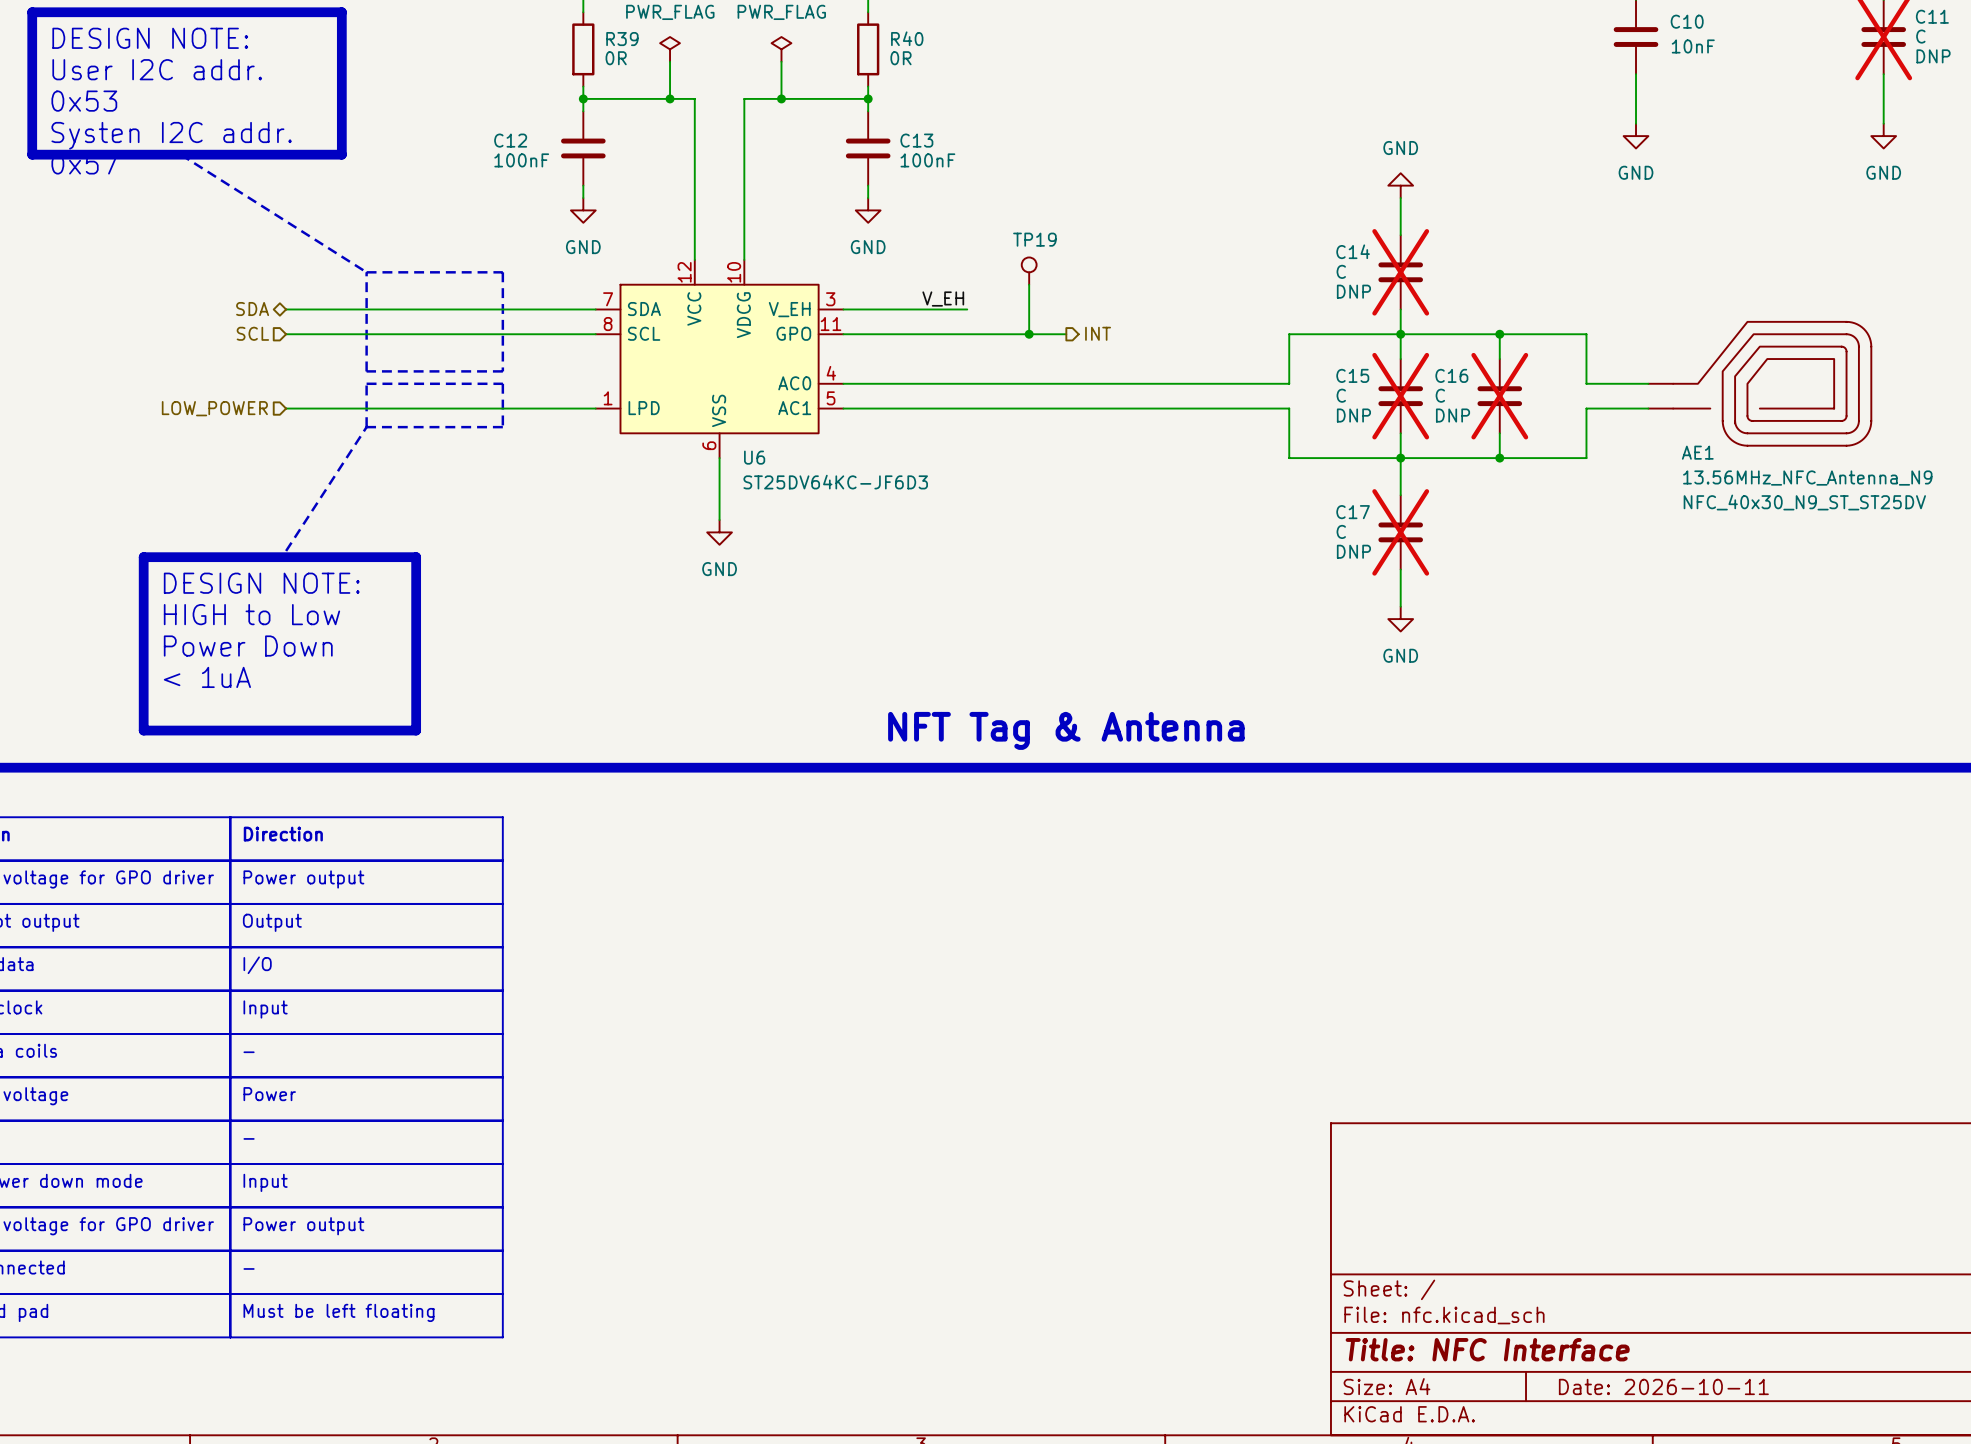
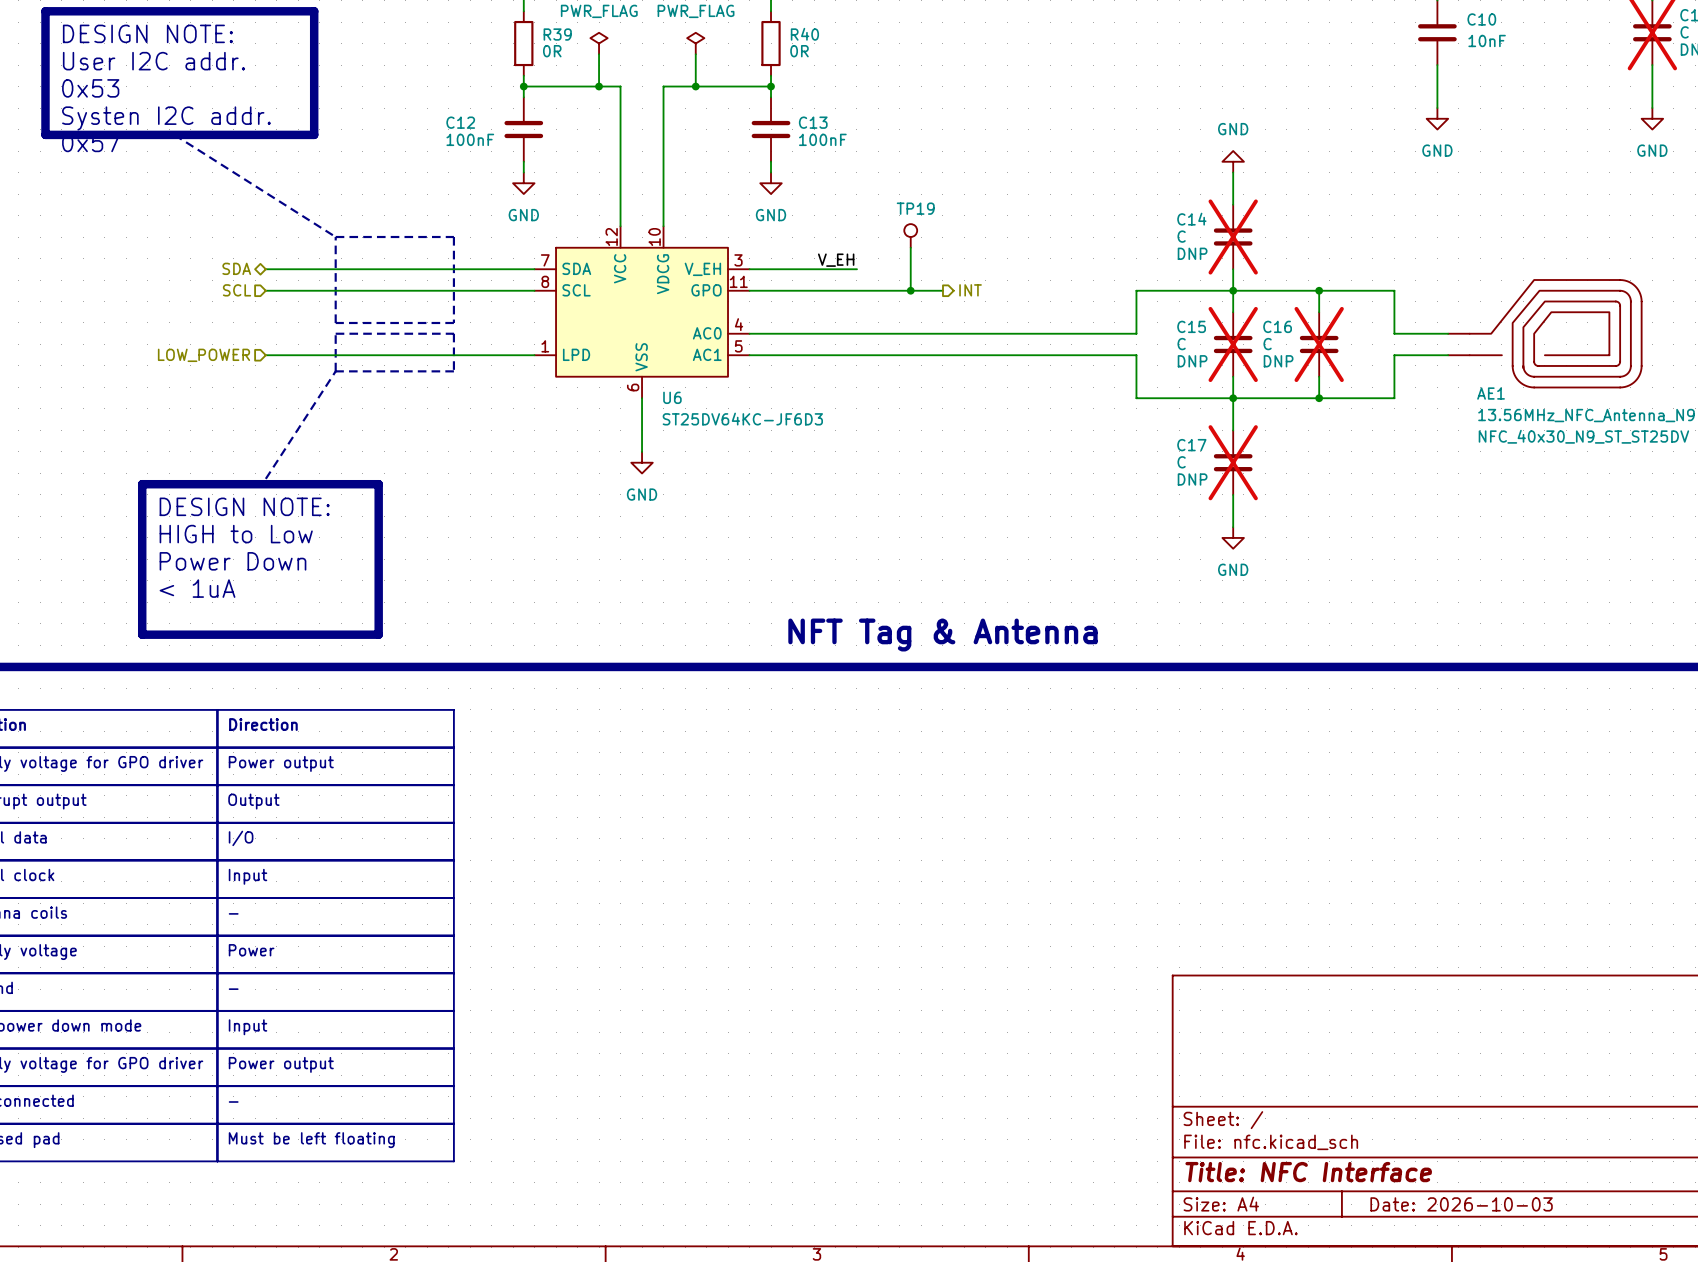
title block: Date: 2026-10-11 (1663, 1386) -> Date: 2026-10-03 (1461, 1204)

